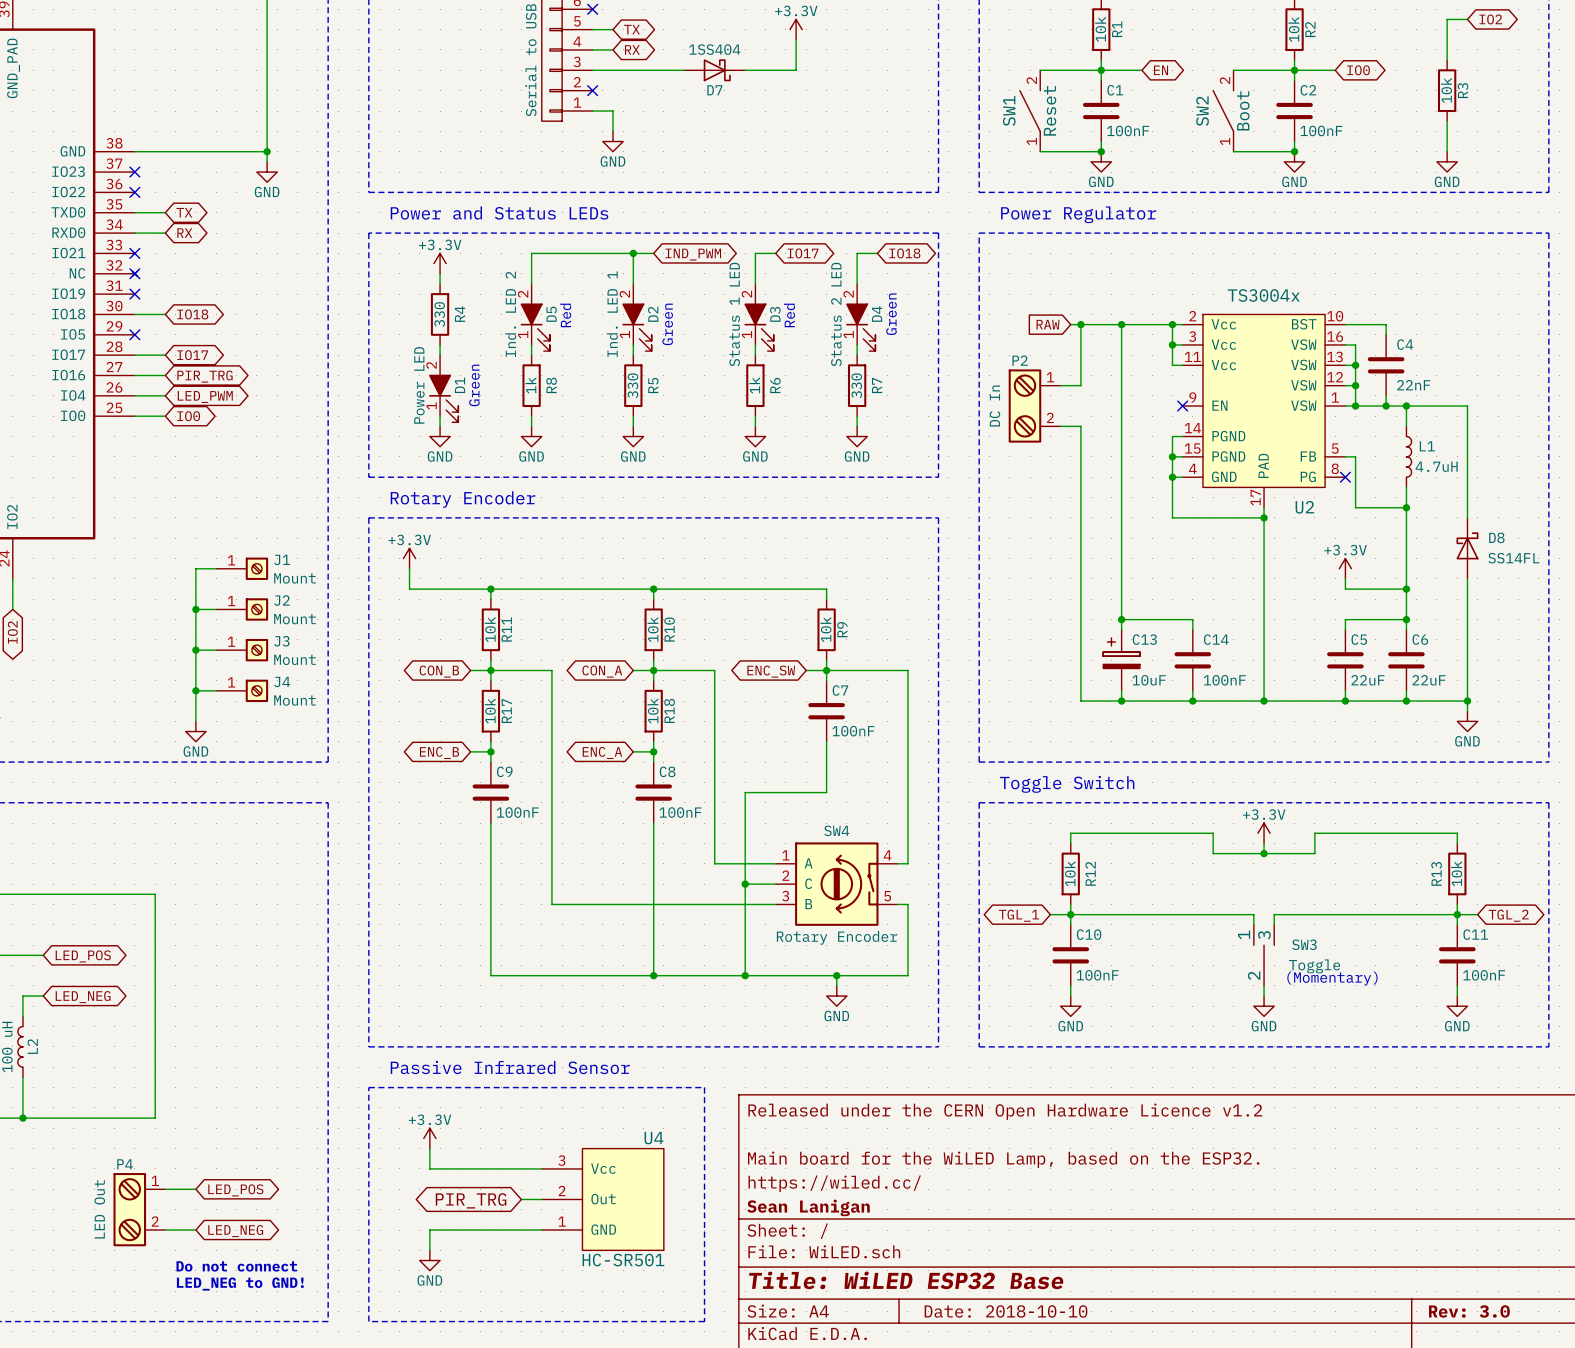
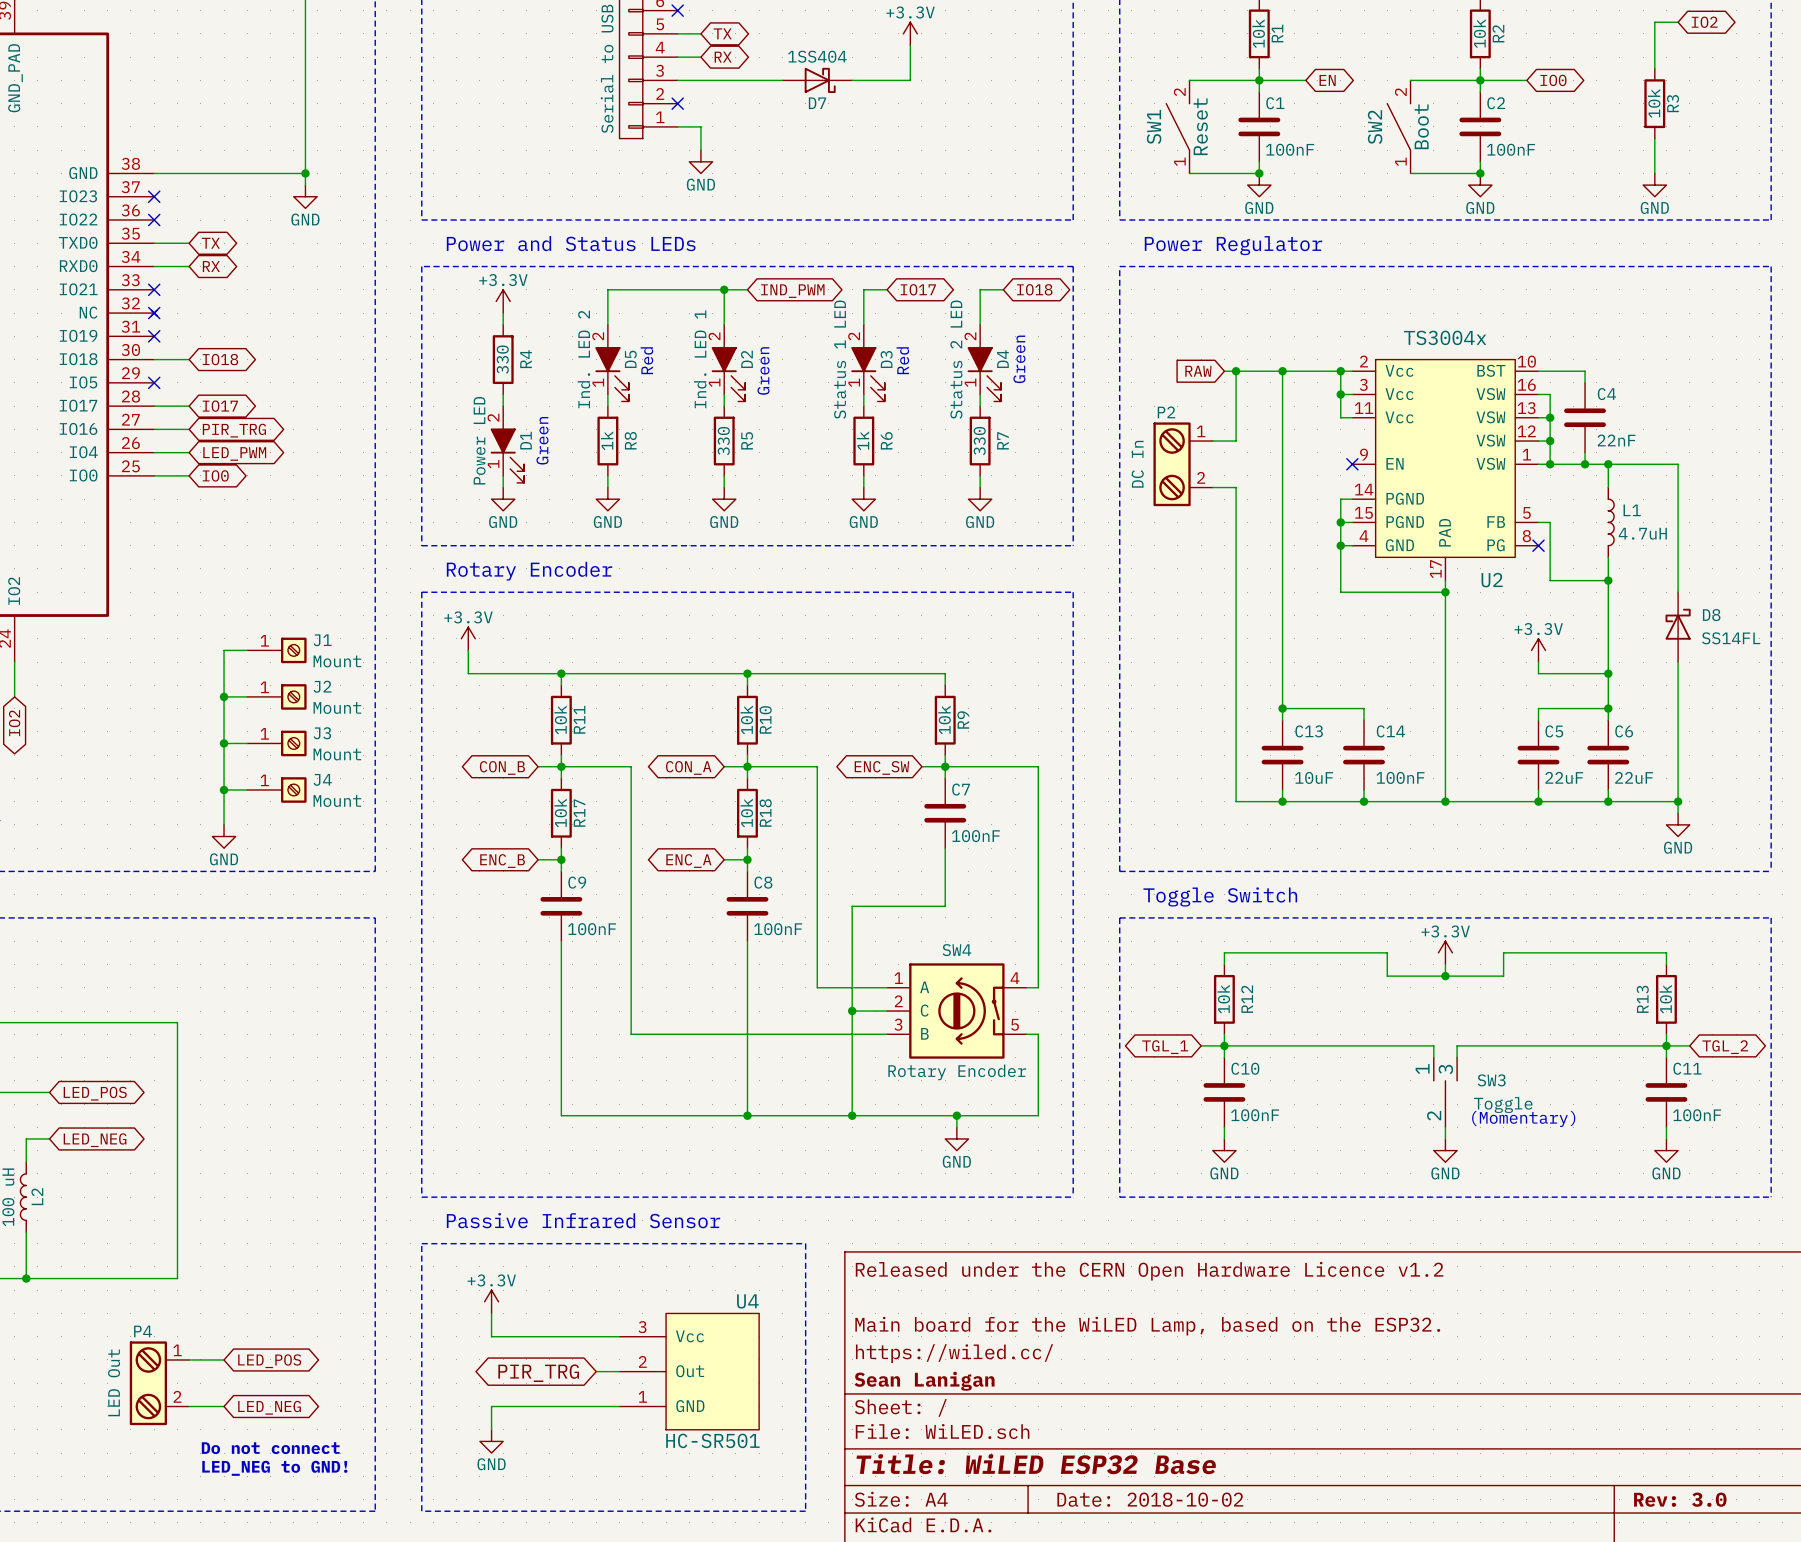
C13 symbol: [1103, 629, 1140, 691] -> [1261, 720, 1304, 790]
title block: Date: 2018-10-10 (1006, 1311) -> Date: 2018-10-02 (1150, 1499)

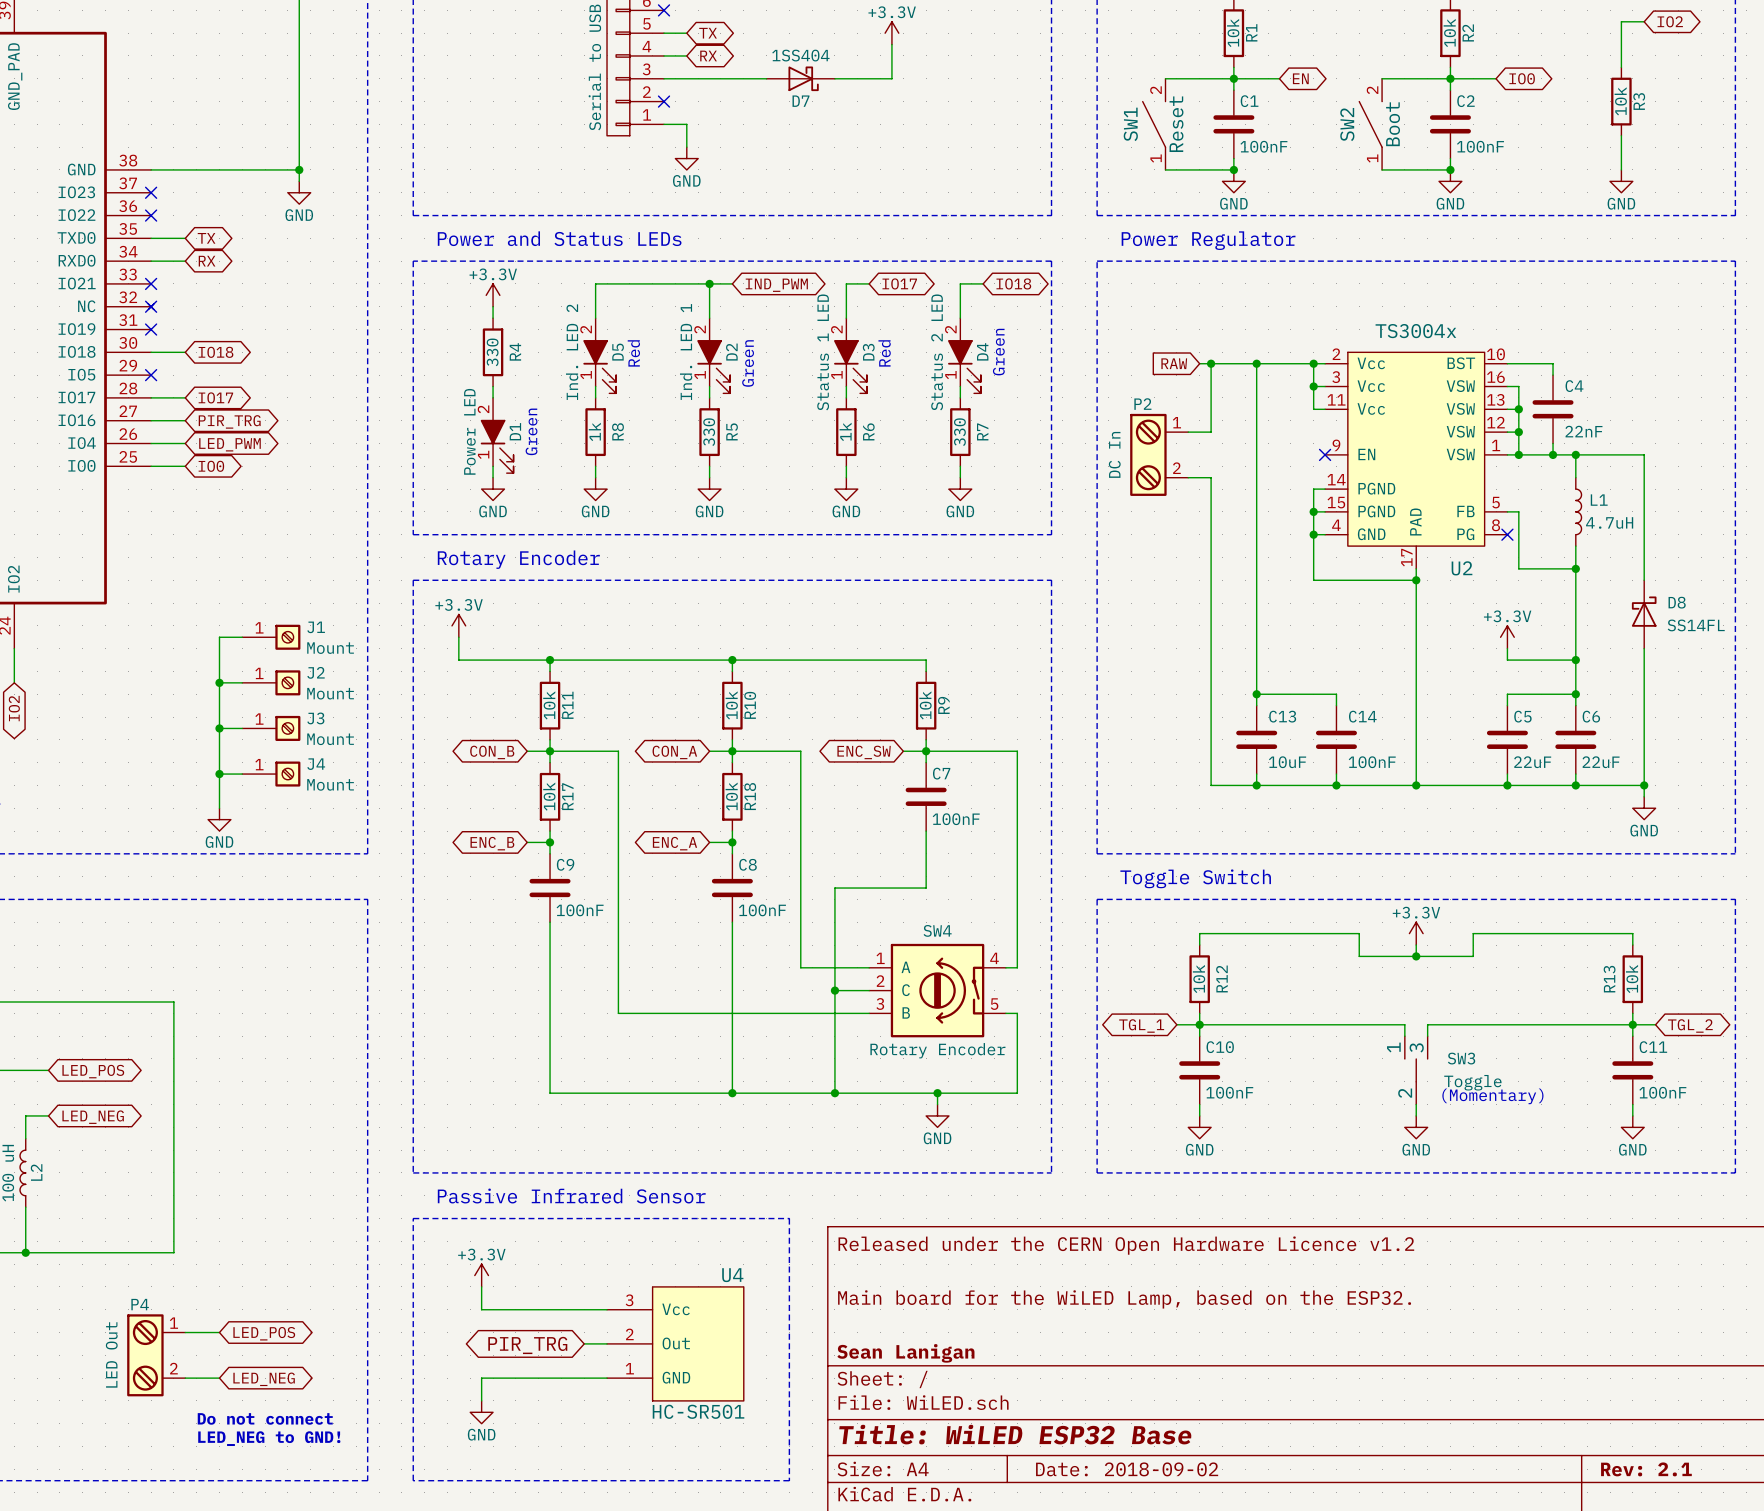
title block: https://wiled.cc/ (954, 1353) -> none
title block: Date: 2018-10-02 (1150, 1499) -> Date: 2018-09-02 (1127, 1469)
title block: Rev: 3.0 (1680, 1499) -> Rev: 2.1 (1646, 1469)

